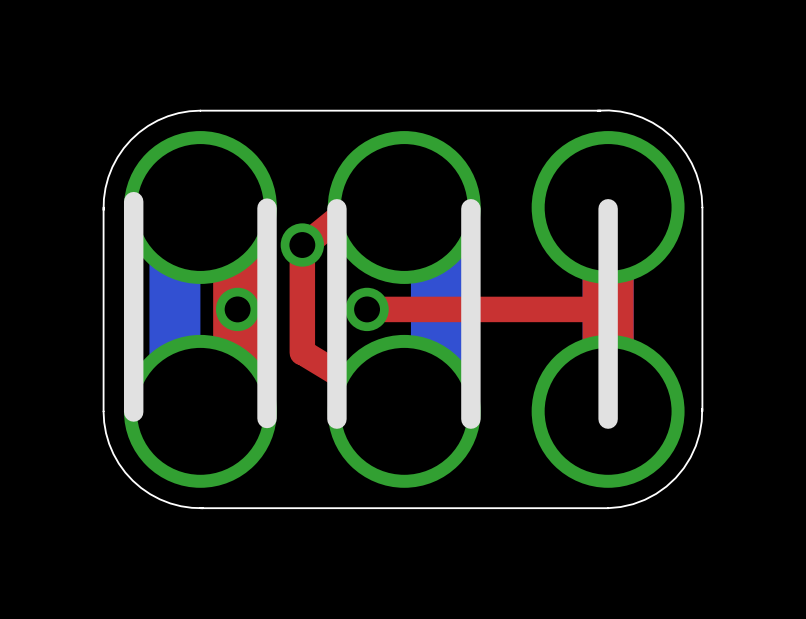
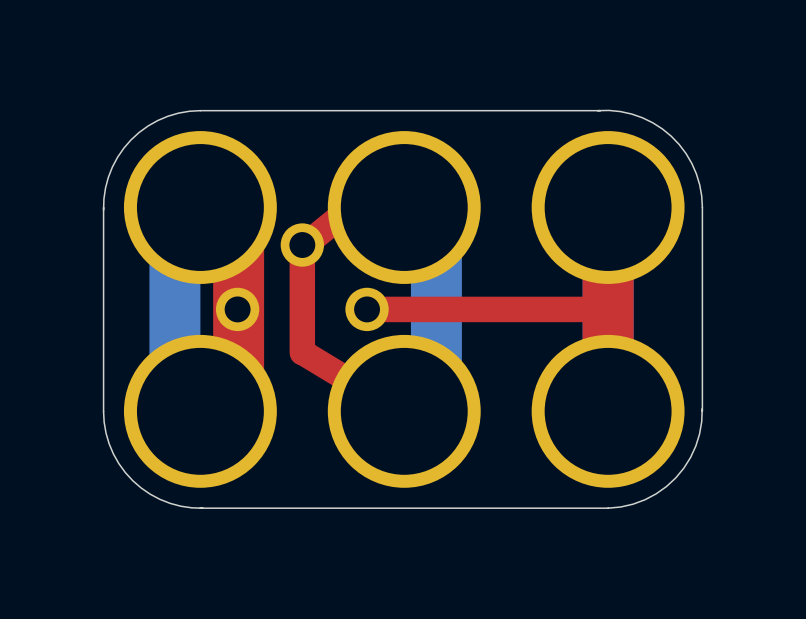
line: (133, 201) (133, 412) -> none
line: (267, 208) (267, 418) -> none
line: (336, 208) (336, 419) -> none
line: (470, 208) (470, 419) -> none
line: (608, 208) (608, 419) -> none

